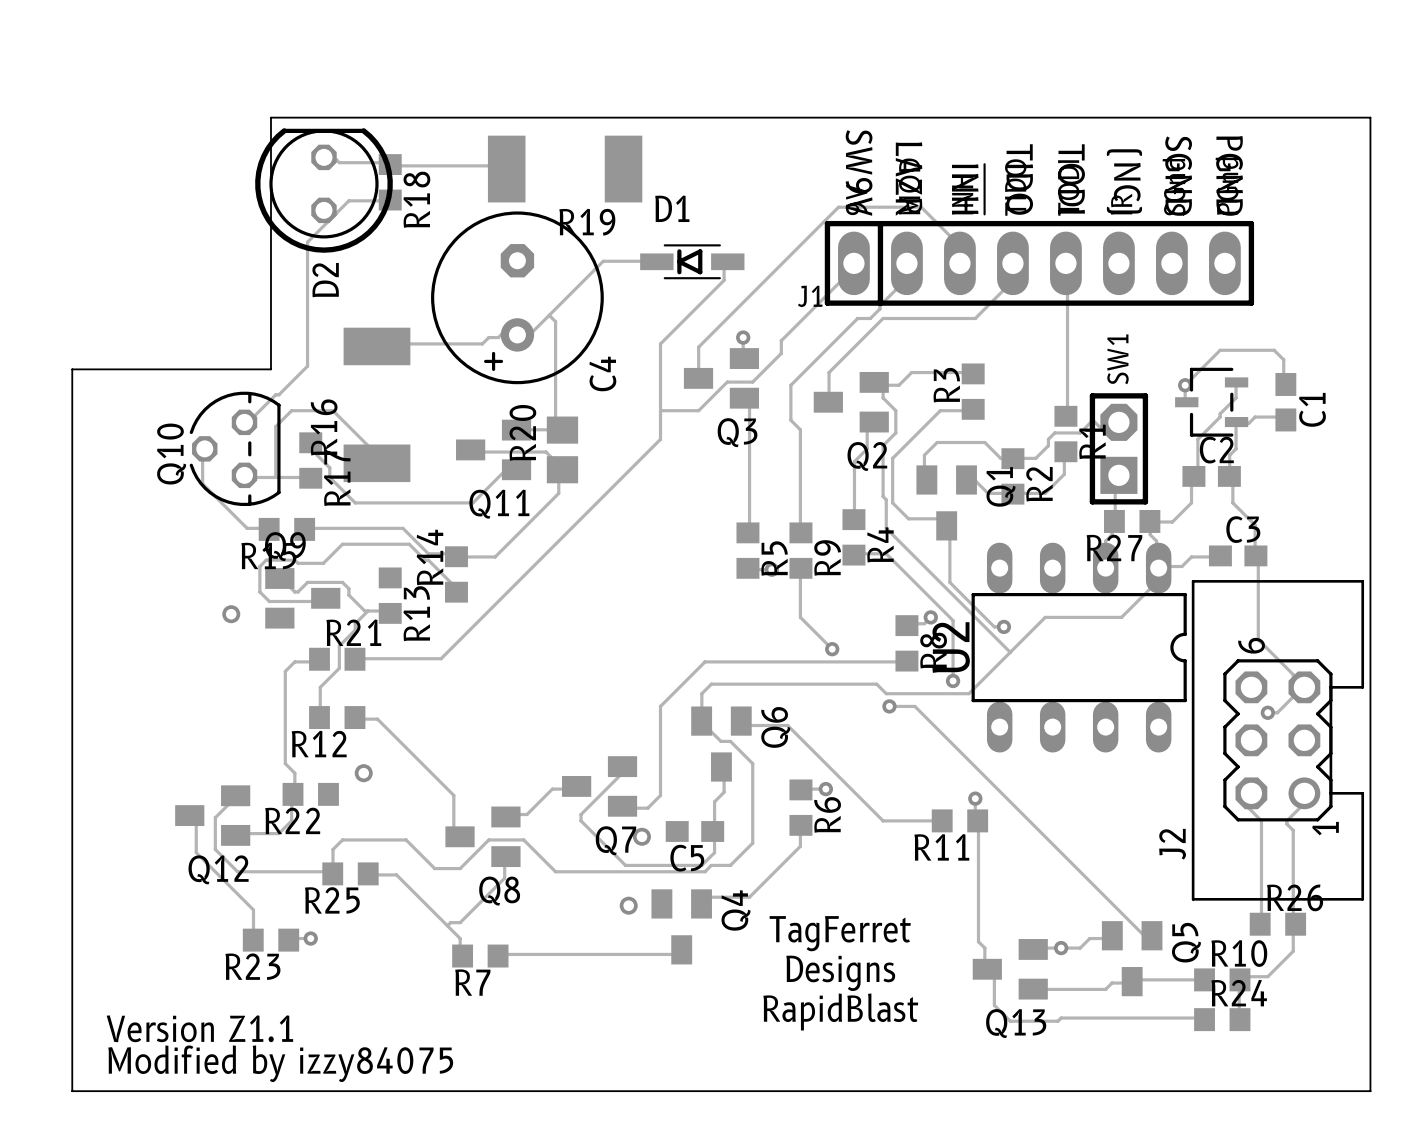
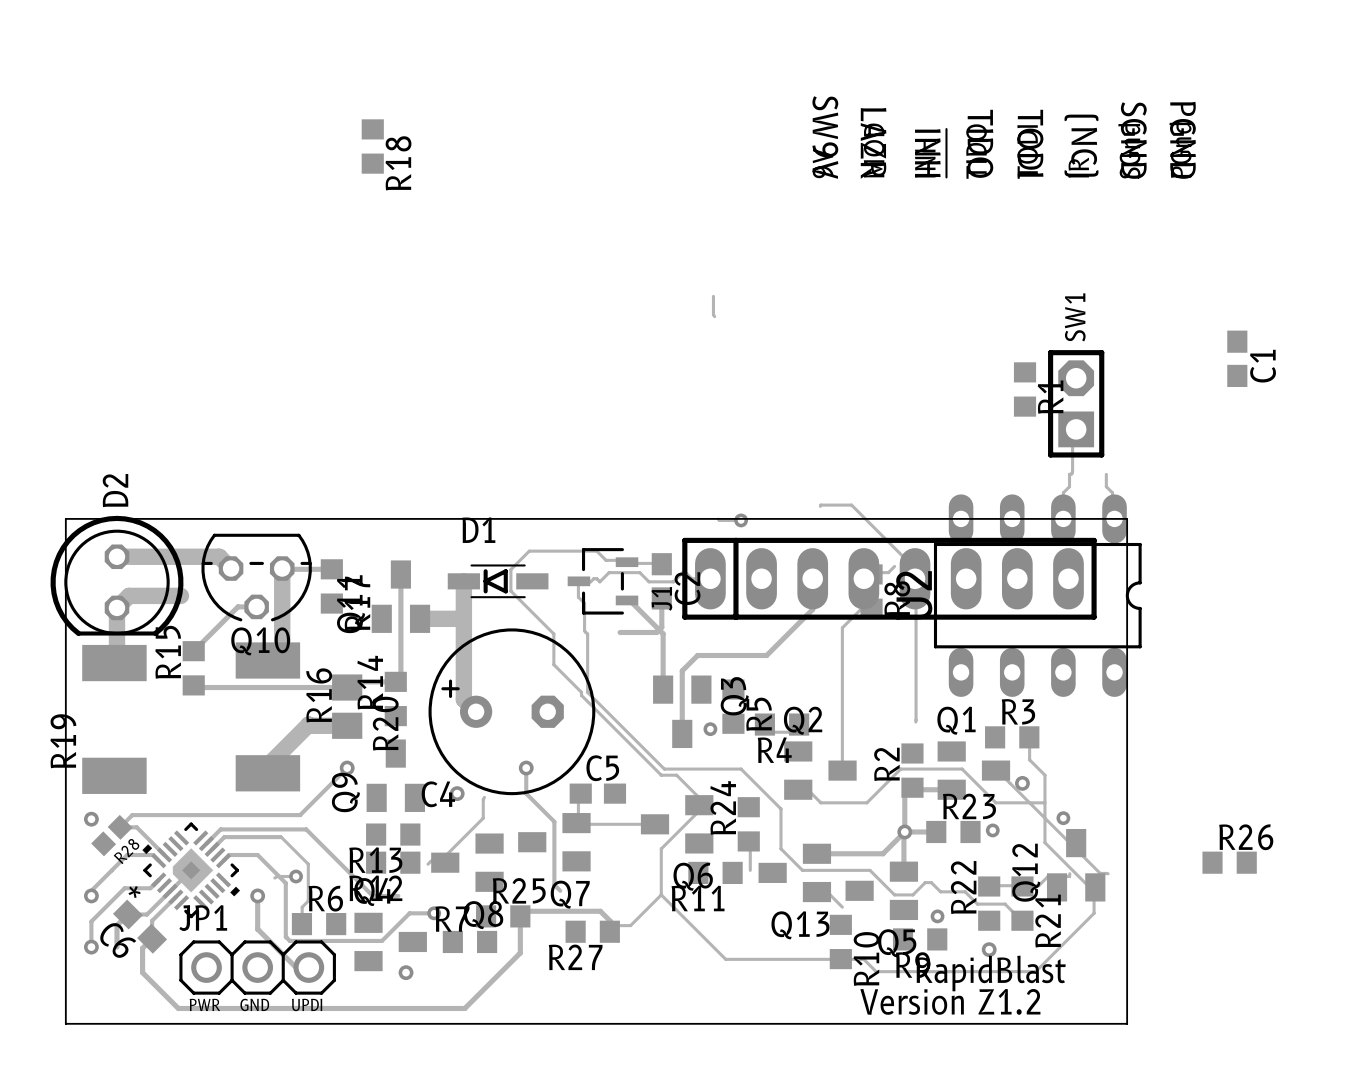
track: (323, 157) (326, 159) (336, 159) (339, 162) (390, 162) (390, 165) (501, 165) (506, 169) -> none
R19 rotation: 0° (565, 169) -> 90° clockwise (114, 719)
R19 position: (565, 169) -> (114, 719)
D2 rotation: 0° (323, 190) -> 180° (116, 575)
D2 position: (323, 190) -> (116, 575)
track: (390, 200) (348, 200) (307, 242) (307, 366) (278, 394) (275, 394) (250, 420) (244, 422) -> none
track: (656, 261) (603, 261) (530, 334) (501, 334) (498, 337) (488, 337) (482, 343) (377, 343) (376, 346) -> none
D1 position: (692, 261) -> (498, 581)
track: (727, 261) (724, 267) (724, 280) (660, 343) (660, 439) (441, 658) (354, 659) -> none
track: (853, 263) (851, 264) (851, 270) (781, 340) (781, 353) (752, 382) (727, 382) (698, 410) (660, 410) -> none
track: (906, 263) (905, 280) (879, 305) (879, 308) (870, 318) (857, 318) (790, 385) (790, 420) (800, 429) (800, 532) -> none
track: (959, 263) (959, 245) (921, 207) (838, 207) (698, 347) (698, 378) -> none
track: (1012, 263) (1010, 264) (1010, 283) (975, 318) (883, 318) (829, 372) (828, 402) -> none
J1 position: (1039, 263) -> (889, 578)
track: (1065, 263) (1067, 264) (1067, 413) (1065, 416) -> none
J1 name rotation: 0° (810, 296) -> 90° counterclockwise (661, 598)
C4 rotation: 0° (517, 297) -> 90° clockwise (511, 711)
C4 position: (517, 297) -> (511, 711)
track: (549, 315) (555, 321) (555, 429) (562, 430) (516, 430) -> none
via: (743, 337) -> none
track: (973, 373) (911, 372) (898, 385) (876, 385) (874, 382) (883, 385) (883, 397) (895, 410) (895, 432) (883, 445) (883, 496) (886, 499) (886, 528) (1010, 652) -> none
Q3 rotation: 0° (721, 378) -> 90° counterclockwise (682, 711)
Q3 position: (721, 378) -> (682, 711)
track: (1236, 382) (1236, 397) (1197, 439) (1197, 471) (1191, 477) (1191, 502) (1172, 521) (1149, 521) -> none
track: (1285, 384) (1283, 382) (1283, 359) (1274, 350) (1220, 350) (1185, 385) (1186, 402) -> none
via: (1185, 385) -> none
R3 rotation: 0° (973, 391) -> 90° clockwise (1012, 737)
R3 position: (973, 391) -> (1012, 737)
track: (744, 398) (749, 404) (749, 531) (747, 532) -> none
Q2 rotation: 0° (851, 402) -> 180° (820, 770)
Q2 position: (851, 402) -> (820, 770)
part: (1211, 402) -> none
R16 position: (376, 404) -> (267, 716)
track: (973, 409) (940, 410) (892, 458) (892, 502) (908, 518) (940, 518) (946, 525) (949, 531) (949, 582) (994, 626) (1003, 626) -> none
track: (1285, 419) (1283, 417) (1255, 417) (1248, 423) (1236, 422) (1236, 448) (1229, 455) (1229, 476) (1232, 480) (1232, 502) (1255, 525) (1255, 553) (1258, 556) (1258, 639) (1293, 674) (1293, 696) (1277, 712) (1267, 712) -> none
track: (874, 422) (867, 429) (867, 448) (854, 461) (853, 519) -> none
track: (1118, 422) (1115, 426) (1099, 426) (1092, 420) (1080, 432) (1054, 432) (1048, 439) (1048, 445) (1035, 458) (1000, 458) (984, 442) (937, 442) (924, 455) (924, 477) (926, 479) -> none
R16 name position: R16 (324, 427) -> R16 (319, 695)
R20 name position: R20 (522, 432) -> R20 (385, 723)
track: (310, 442) (317, 455) (329, 467) (329, 477) (355, 502) (472, 502) (504, 471) (516, 469) -> none
track: (204, 448) (202, 448) (202, 483) (247, 528) (269, 529) -> none
Q10 rotation: 0° (235, 448) -> 90° counterclockwise (256, 577)
Q10 position: (235, 448) -> (256, 577)
track: (470, 449) (472, 452) (546, 452) (562, 469) (558, 474) (558, 493) (495, 556) (457, 556) (453, 553) (428, 553) (402, 528) (304, 529) -> none
Q11 rotation: 0° (493, 449) -> 90° clockwise (400, 596)
Q11 position: (493, 449) -> (400, 596)
R20 position: (562, 449) -> (347, 706)
track: (1065, 451) (1064, 452) (1064, 474) (1045, 493) (988, 493) (975, 480) (966, 479) -> none
R17 position: (310, 460) -> (331, 586)
track: (376, 463) (374, 461) (374, 452) (333, 410) (291, 410) (275, 426) (275, 477) -> none
track: (244, 475) (247, 477) (310, 478) -> none
R2 position: (1012, 476) -> (912, 770)
C2 rotation: 0° (1211, 476) -> 90° clockwise (661, 581)
C2 position: (1211, 476) -> (661, 581)
R2 name position: R2 (1039, 484) -> R2 (886, 764)
Q1 rotation: 0° (946, 502) -> 90° counterclockwise (973, 770)
Q1 position: (946, 502) -> (973, 770)
R27 position: (1132, 521) -> (592, 931)
R15 rotation: 0° (286, 529) -> 90° clockwise (193, 668)
R15 position: (286, 529) -> (193, 668)
R4 rotation: 0° (853, 537) -> 90° clockwise (782, 724)
R4 position: (853, 537) -> (782, 724)
R5 position: (747, 550) -> (733, 706)
R9 rotation: 0° (800, 550) -> 90° clockwise (920, 939)
R9 position: (800, 550) -> (920, 939)
track: (1220, 555) (1191, 556) (1181, 566) (1159, 566) (1156, 569) (1156, 582) (1121, 617) (1045, 617) (968, 693) (886, 693) (876, 684) (711, 684) (701, 693) (701, 722) (720, 741) (730, 741) (752, 763) (752, 843) (730, 865) (711, 865) (705, 871) (555, 871) (523, 839) (488, 839) (460, 868) (434, 868) (406, 839) (342, 839) (333, 849) (332, 873) (329, 871) (237, 871) (215, 849) (215, 817) (235, 795) -> none
C3: (1238, 555) -> none
board edge: (72, 568) (72, 369) (270, 369) (270, 117) (1370, 117) (1370, 1091) (1171, 1091) -> (65, 518) (1127, 518) (1127, 1023)
track: (800, 568) (800, 617) (832, 649) -> none
R14 position: (456, 574) -> (395, 698)
track: (279, 578) (294, 591) (298, 591) (307, 582) (342, 582) (348, 588) (348, 595) (364, 611) (390, 611) (390, 613) -> none
track: (456, 592) (453, 591) (453, 585) (409, 544) (342, 544) (323, 563) (298, 563) (294, 560) (266, 560) (259, 566) (259, 591) (269, 601) (320, 601) (325, 598) -> none
R13 rotation: 0° (390, 595) -> 90° clockwise (393, 834)
R13 position: (390, 595) -> (393, 834)
Q9 rotation: 0° (302, 598) -> 90° counterclockwise (395, 775)
Q9 position: (302, 598) -> (395, 775)
track: none -> (116, 556) (219, 556) (231, 568)
track: (367, 611) (355, 623) (355, 630) (339, 646) (339, 668) (320, 687) (319, 717) -> none
via: (231, 614) -> none
track: none -> (661, 564) (627, 563) (624, 560) (606, 560) (596, 551) (529, 551) (510, 569) (510, 591) (553, 634) (553, 664) (581, 692) (581, 695) (661, 775) (676, 775) (698, 796) (698, 812) (661, 848) (661, 894)
via: (930, 617) -> none
track: none -> (331, 569) (282, 568) (282, 646) (267, 660)
track: none -> (400, 574) (400, 676) (395, 681) (352, 681) (347, 687) (195, 687) (193, 685)
via: (1003, 626) -> none
track: none -> (710, 578) (691, 578) (685, 572) (682, 572) (673, 581) (649, 581) (639, 572) (609, 572) (599, 581) (596, 578) (590, 581) (578, 581) (578, 597) (584, 603) (584, 630) (587, 634) (587, 692) (664, 769) (741, 769) (781, 808) (781, 848) (802, 870) (870, 870) (894, 894) (912, 894) (925, 882) (931, 882) (940, 891) (965, 891) (977, 904) (1005, 904) (1022, 920)
track: none -> (812, 578) (812, 609) (766, 655) (697, 655) (682, 670) (682, 733)
track: none -> (863, 578) (863, 606) (842, 627) (842, 770)
track: none -> (463, 581) (463, 699) (476, 711)
part: none -> (602, 581)
track: none -> (180, 595) (129, 595) (116, 607) (116, 660)
via: (832, 649) -> none
track: none -> (661, 598) (661, 627) (656, 632) (620, 632)
track: none -> (627, 600) (629, 600) (663, 633) (663, 689)
track: none -> (256, 606) (238, 606) (193, 651)
track: (319, 659) (317, 661) (294, 661) (285, 671) (285, 763) (294, 773) (294, 792) (291, 795) (291, 820) (278, 833) (237, 833) (235, 835) -> none
R21 rotation: 0° (337, 659) -> 90° clockwise (1022, 903)
R21 position: (337, 659) -> (1022, 903)
track: (906, 661) (705, 661) (660, 706) (660, 795) (647, 808) (625, 808) (622, 806) -> none
track: none -> (463, 614) (459, 618) (420, 618)
track: none -> (916, 627) (915, 722)
via: (953, 680) -> none
track: (889, 706) (914, 706) (1035, 827) -> none
via: (889, 706) -> none
via: (1267, 712) -> none
R12 position: (337, 717) -> (393, 862)
track: (354, 717) (355, 719) (377, 719) (453, 795) (453, 833) (460, 836) -> none
track: (741, 721) (746, 725) (787, 725) (883, 820) (942, 820) -> none
J2: (1277, 740) -> none
Q6 rotation: 0° (721, 744) -> 90° clockwise (677, 824)
Q6 position: (721, 744) -> (677, 824)
track: (622, 766) (622, 773) (581, 814) (581, 820) (625, 865) (701, 865) (714, 852) (714, 833) (712, 831) (714, 830) (714, 801) (724, 792) (724, 770) (721, 766) -> none
via: (363, 773) -> none
track: none -> (347, 725) (308, 724) (267, 765) (267, 773)
via: none -> (710, 729)
track: (576, 786) (574, 789) (552, 789) (526, 814) (507, 814) (505, 816) -> none
Q7 position: (599, 786) -> (554, 842)
via: (825, 789) -> none
track: (1251, 793) (1248, 795) (1248, 808) (1261, 820) (1260, 924) -> none
track: (1304, 793) (1302, 804) (1286, 820) (1286, 824) (1293, 830) (1293, 922) (1295, 924) (1293, 925) (1293, 951) (1267, 976) (1245, 976) (1239, 979) (1240, 1019) -> none
R22 rotation: 0° (310, 794) -> 90° clockwise (989, 903)
R22 position: (310, 794) -> (989, 903)
track: none -> (1029, 737) (1029, 759) (1044, 775) (1044, 842) (1087, 885) (1095, 887) (1094, 913) (1035, 971) (876, 971) (863, 959) (725, 959) (661, 894)
track: (975, 798) (975, 820) (978, 820) (978, 941) (984, 948) (984, 967) (994, 976) (994, 1005) (1010, 1021) (1057, 1021) (1061, 1018) (1204, 1018) (1204, 1019) -> none
via: (975, 798) -> none
R6 rotation: 0° (800, 807) -> 90° clockwise (319, 924)
R6 position: (800, 807) -> (319, 924)
R6 name position: R6 (827, 814) -> R6 (325, 898)
track: (189, 815) (196, 824) (196, 852) (253, 909) (253, 940) -> none
Q12 rotation: 0° (212, 815) -> 90° clockwise (1076, 865)
Q12 position: (212, 815) -> (1076, 865)
R11 position: (959, 820) -> (715, 872)
track: (800, 825) (800, 846) (749, 897) (708, 897) (701, 903) -> none
track: none -> (347, 768) (300, 815) (132, 815) (120, 827)
via: none -> (347, 768)
track: none -> (526, 768) (526, 793) (554, 821) (554, 884) (560, 890)
via: none -> (526, 768)
C5 position: (694, 831) -> (597, 793)
Q8 position: (482, 836) -> (467, 862)
via: (641, 836) -> none
via: none -> (1022, 783)
track: none -> (798, 789) (808, 790) (820, 802) (866, 802) (900, 769) (962, 769) (995, 802) (1044, 802)
track: none -> (951, 789) (914, 789) (912, 787) (904, 795) (904, 831)
via: none -> (457, 793)
track: none -> (580, 793) (578, 793) (578, 821) (576, 823) (578, 824) (655, 824)
C5 name position: C5 (687, 858) -> C5 (602, 768)
R25 position: (350, 873) -> (503, 916)
track: (368, 873) (396, 874) (460, 938) (460, 954) (462, 956) -> none
via: none -> (1063, 818)
via: none -> (91, 819)
track: none -> (120, 827) (136, 827) (164, 855)
via: none -> (992, 830)
track: none -> (904, 831) (883, 853) (816, 853)
track: none -> (904, 831) (936, 831)
via: none -> (904, 831)
track: none -> (903, 832) (903, 871)
R28: none -> (111, 835)
R25 name position: R25 (332, 900) -> R25 (519, 890)
track: none -> (748, 841) (750, 870)
track: none -> (206, 843) (220, 829) (306, 829) (372, 895) (398, 895)
via: (628, 905) -> none
track: none -> (212, 849) (224, 837) (280, 836) (308, 864) (308, 901) (302, 907) (301, 924)
track: none -> (158, 860) (153, 855) (127, 855) (91, 890) (91, 895)
track: none -> (223, 860) (229, 855) (257, 855) (285, 883) (285, 936) (289, 940) (381, 940) (409, 913) (434, 913)
Q4 rotation: 0° (681, 926) -> 90° counterclockwise (390, 941)
Q4 position: (681, 926) -> (390, 941)
track: none -> (191, 870) (147, 914) (127, 914) (116, 925) (116, 947)
part: none -> (191, 870)
text: TagFerret (840, 933) -> none
R23 position: (270, 940) -> (953, 831)
track: none -> (158, 879) (150, 888) (124, 888) (91, 921) (91, 947)
via: (1061, 948) -> none
track: (681, 949) (676, 954) (498, 954) (498, 956) -> none
track: none -> (816, 892) (817, 894) (830, 894) (842, 907)
R7 position: (480, 956) -> (469, 941)
track: none -> (661, 894) (630, 925) (612, 925) (609, 931)
via: none -> (91, 895)
track: none -> (257, 895) (257, 929) (301, 972) (308, 967)
via: none -> (257, 895)
Q5 rotation: 0° (1132, 958) -> 90° clockwise (881, 890)
Q5 position: (1132, 958) -> (881, 890)
track: none -> (175, 897) (152, 920) (152, 938) (142, 948) (142, 972) (178, 1008) (464, 1008) (520, 952) (520, 916) (526, 911) (600, 911) (610, 921) (609, 931)
R23 name position: R23 (252, 966) -> R23 (969, 806)
Q13 position: (1010, 969) -> (794, 872)
text: Designs (840, 973) -> none
via: none -> (434, 913)
via: none -> (937, 916)
track: (1204, 979) (1134, 979) (1131, 983) (1112, 983) (1105, 989) (1033, 989) -> none
R10 rotation: 0° (1222, 979) -> 90° clockwise (840, 941)
R10 position: (1222, 979) -> (840, 941)
C6: none -> (140, 926)
R24 name position: R24 (1239, 993) -> R24 (723, 807)
via: none -> (91, 947)
text position: RapidBlast (840, 1011) -> RapidBlast (990, 973)
via: none -> (989, 949)
R24 rotation: 0° (1222, 1019) -> 90° clockwise (748, 824)
R24 position: (1222, 1019) -> (748, 824)
text: Version Z1.1 (199, 1028) -> none
JP1: none -> (257, 967)
via: none -> (406, 972)
text: Modified by izzy84075 (280, 1063) -> none
text: none -> Version Z1.2 (950, 1001)
text: none -> PWR (204, 1004)
text: none -> GND (254, 1004)
text: none -> UPDI (307, 1004)

